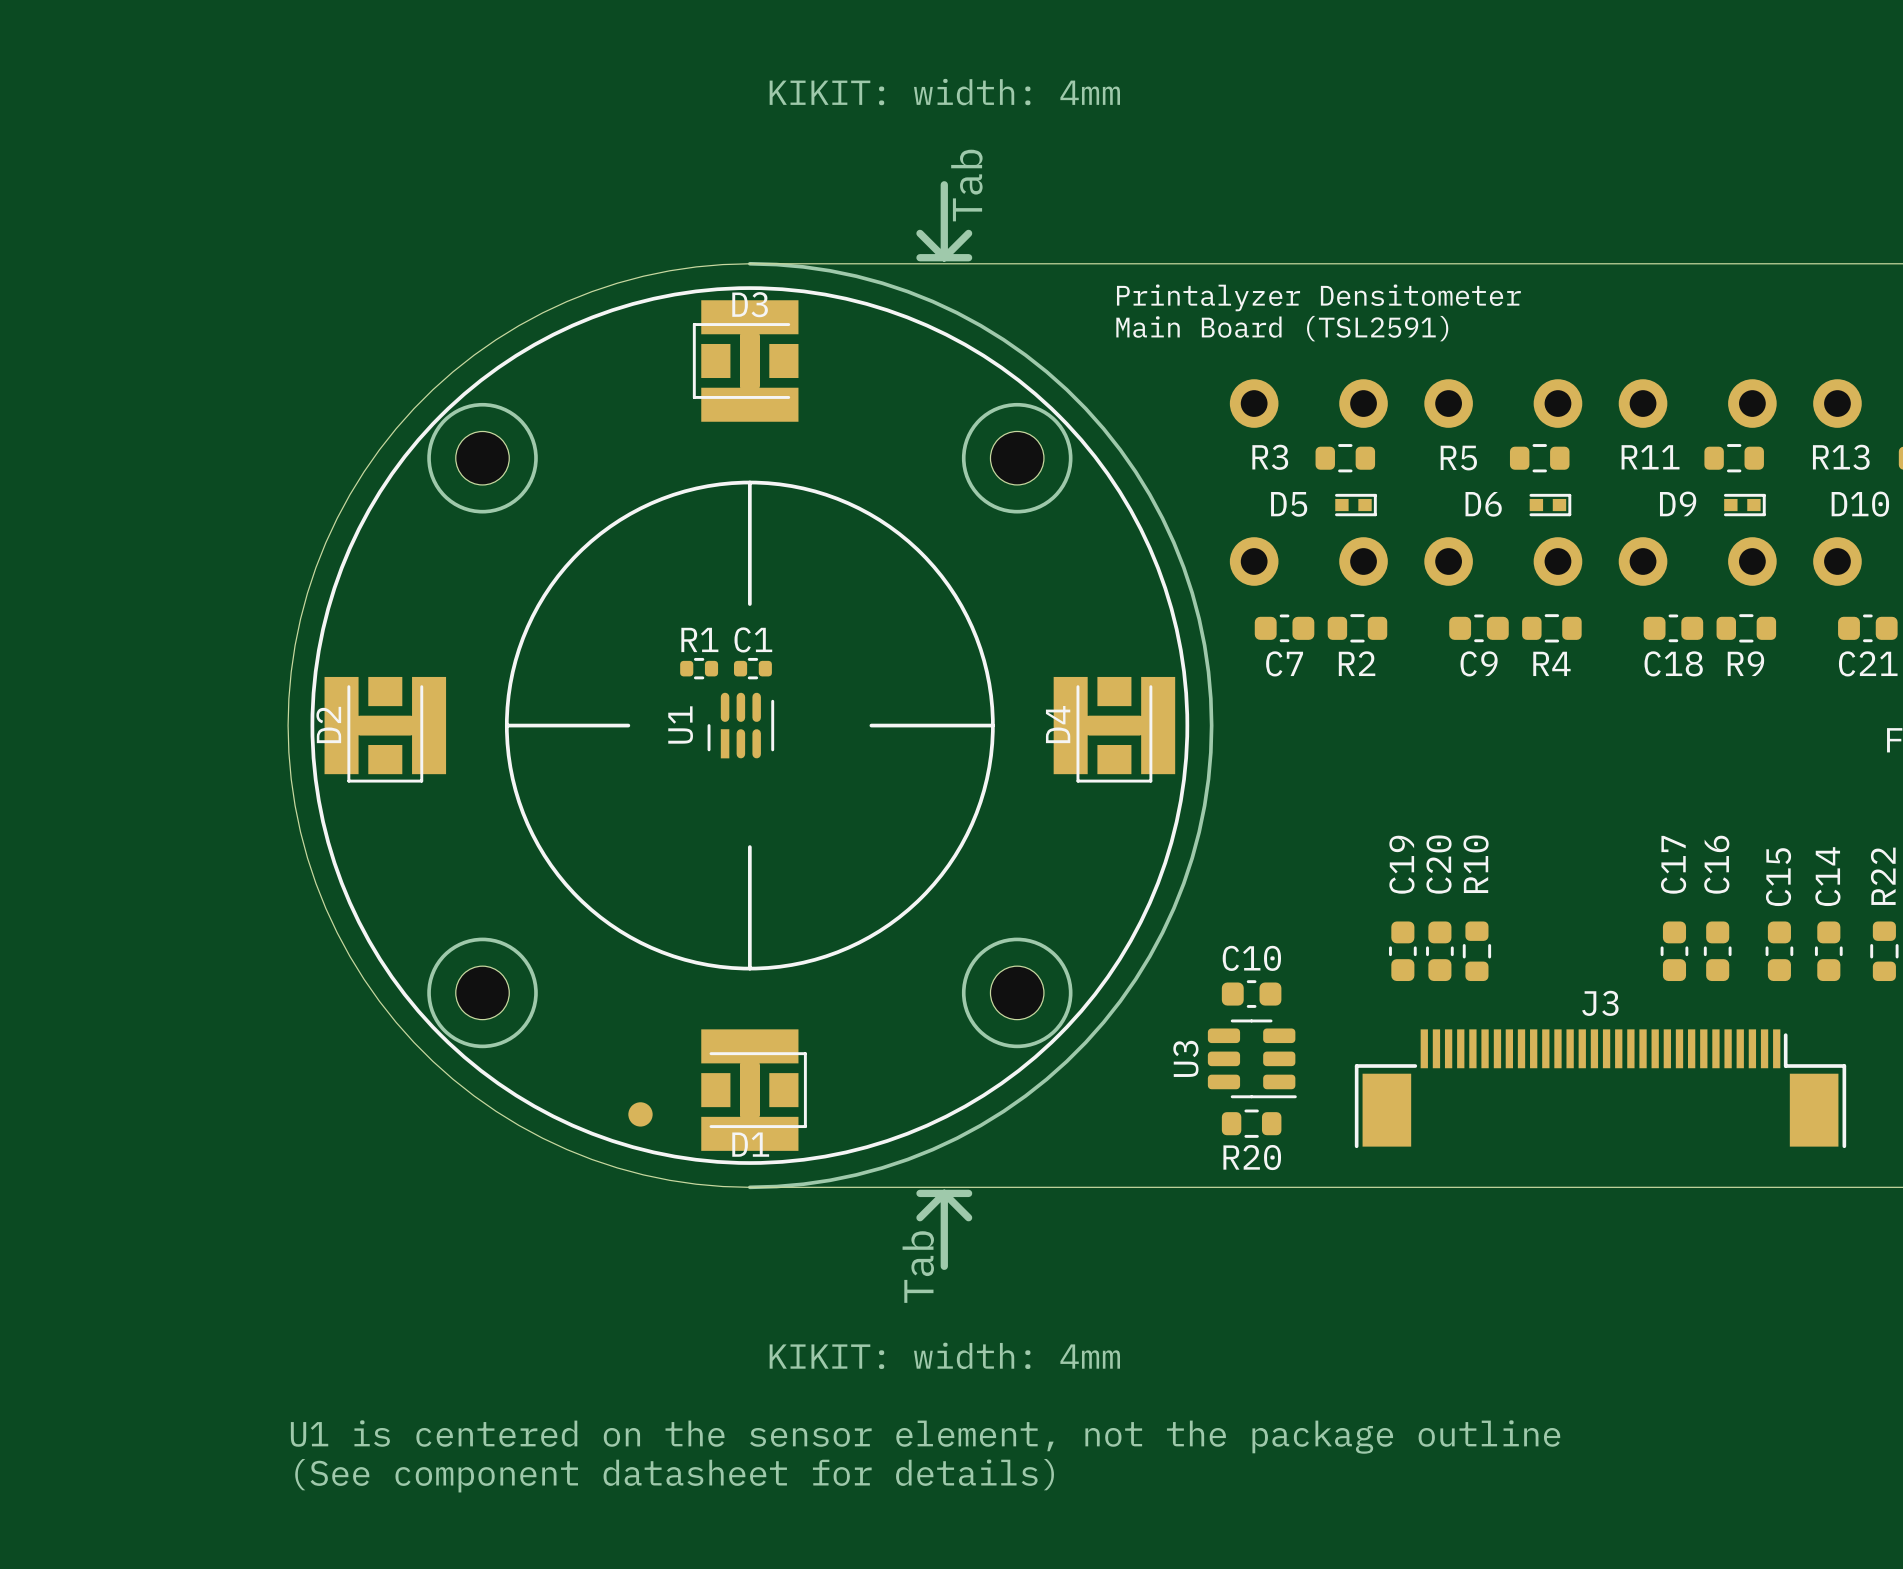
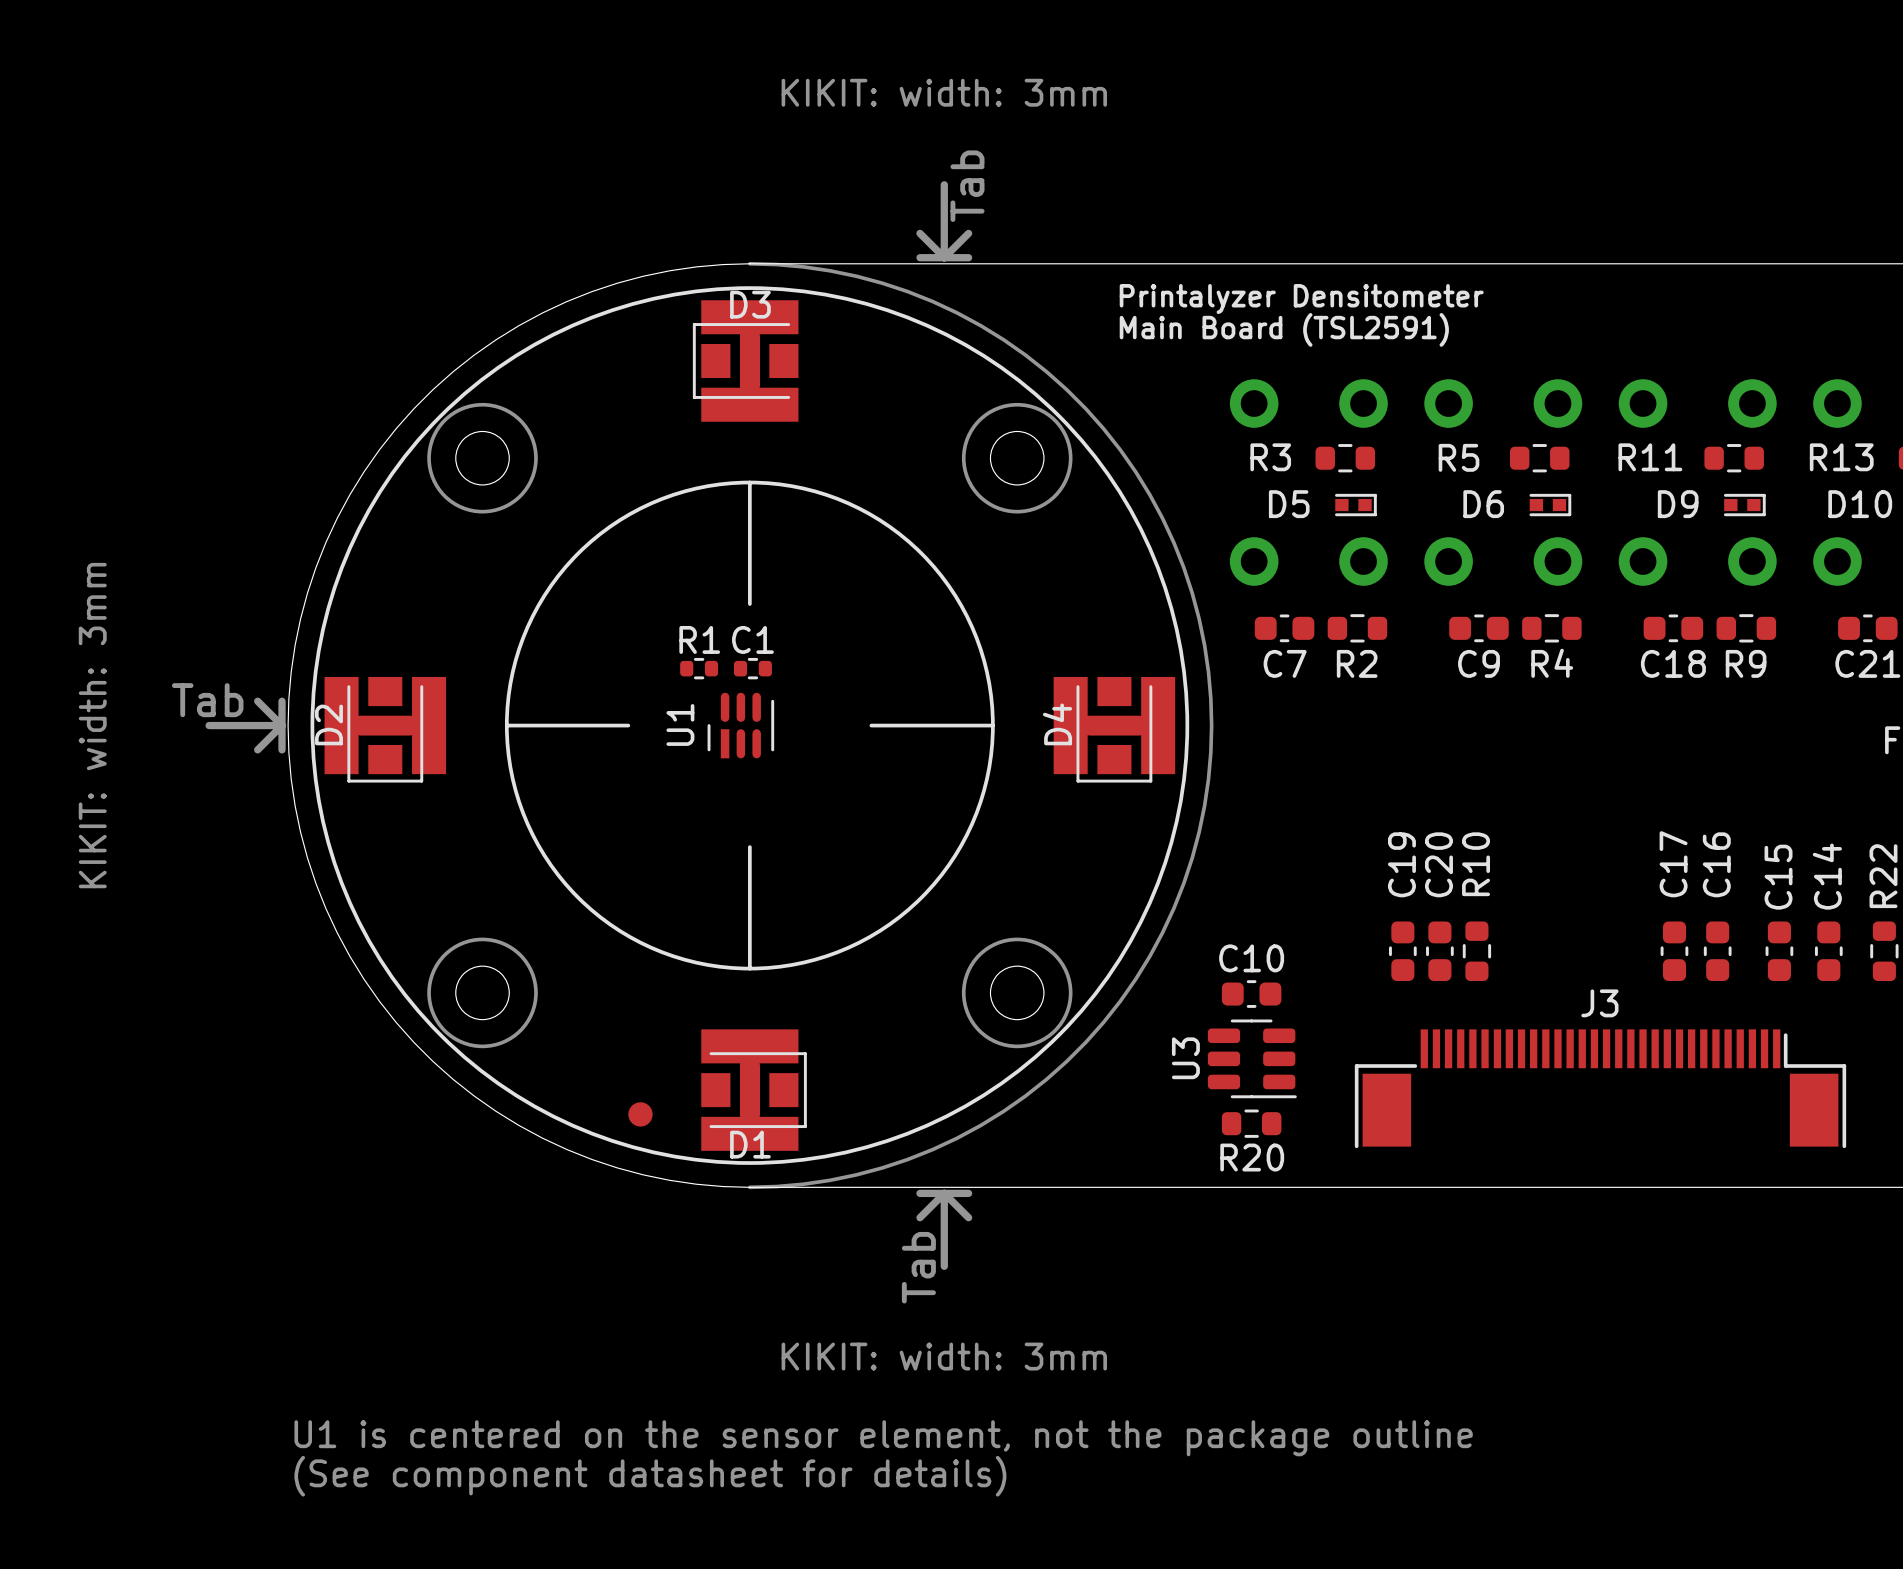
drawing shape: [769, 78, 1121, 262] -> [781, 78, 1107, 262]
drawing: none -> [205, 697, 286, 754]
drawing shape: [769, 1189, 1121, 1370] -> [781, 1189, 1107, 1371]

